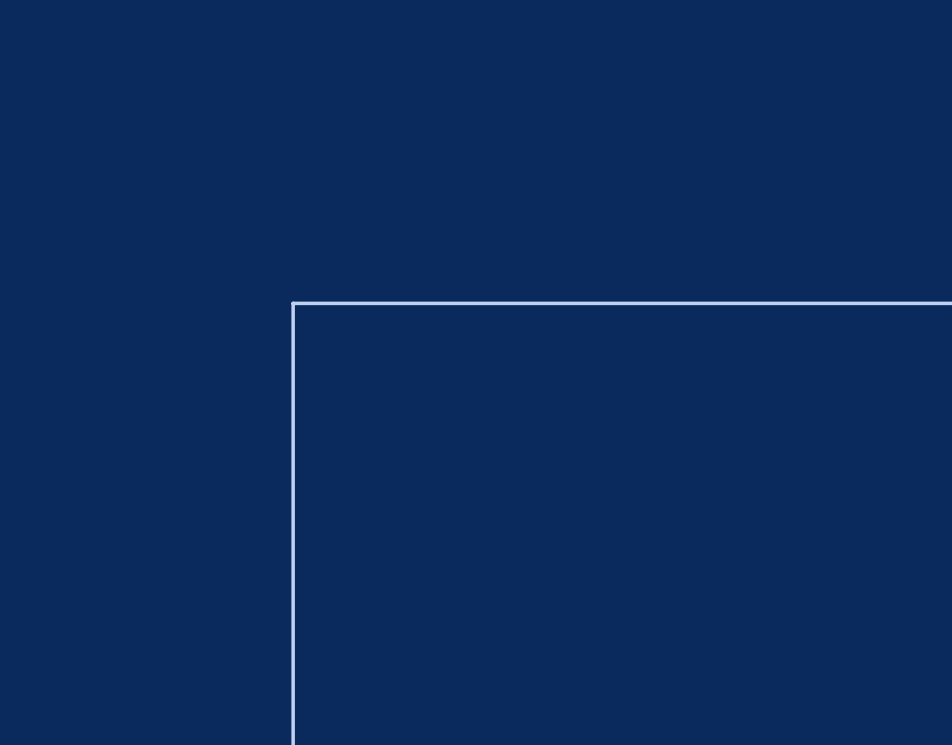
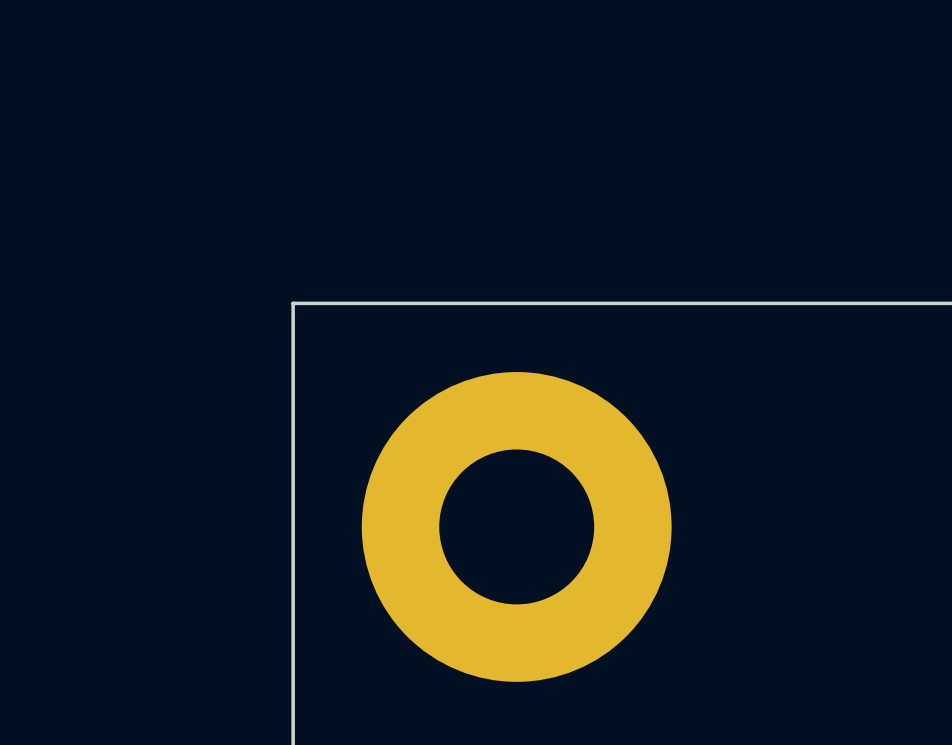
part: none -> (516, 526)

